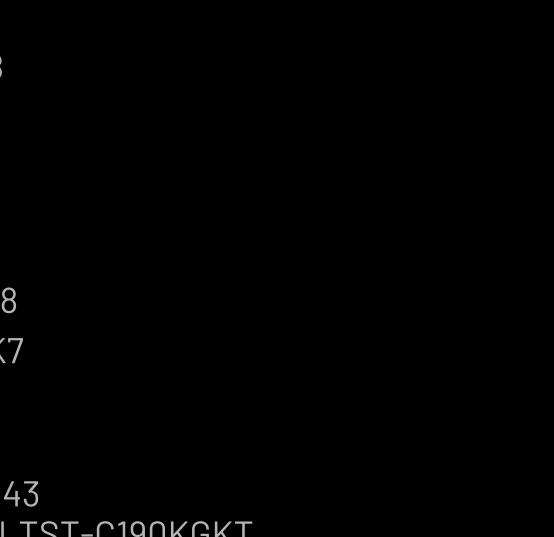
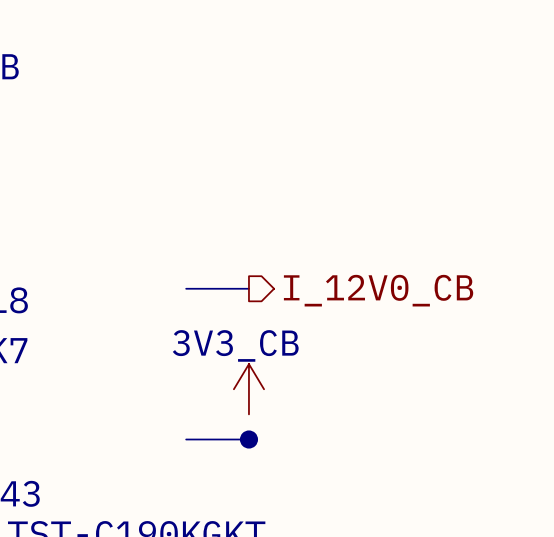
hierarchical label: none -> I_12V0_CB (378, 290)
wire: none -> (186, 288) (248, 288)
power symbol: none -> 3V3_CB (248, 389)
wire: none -> (186, 439) (248, 439)
junction: none -> (248, 439)

